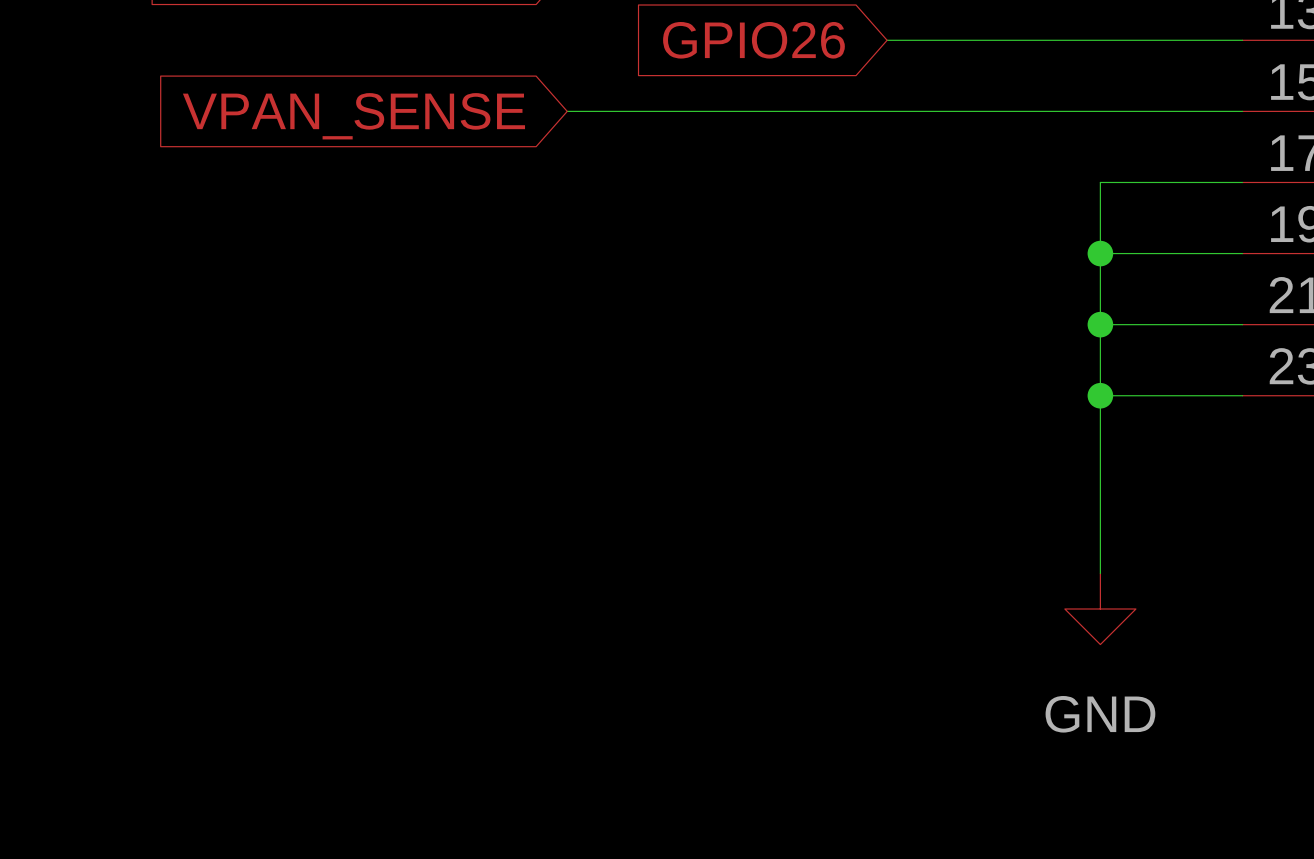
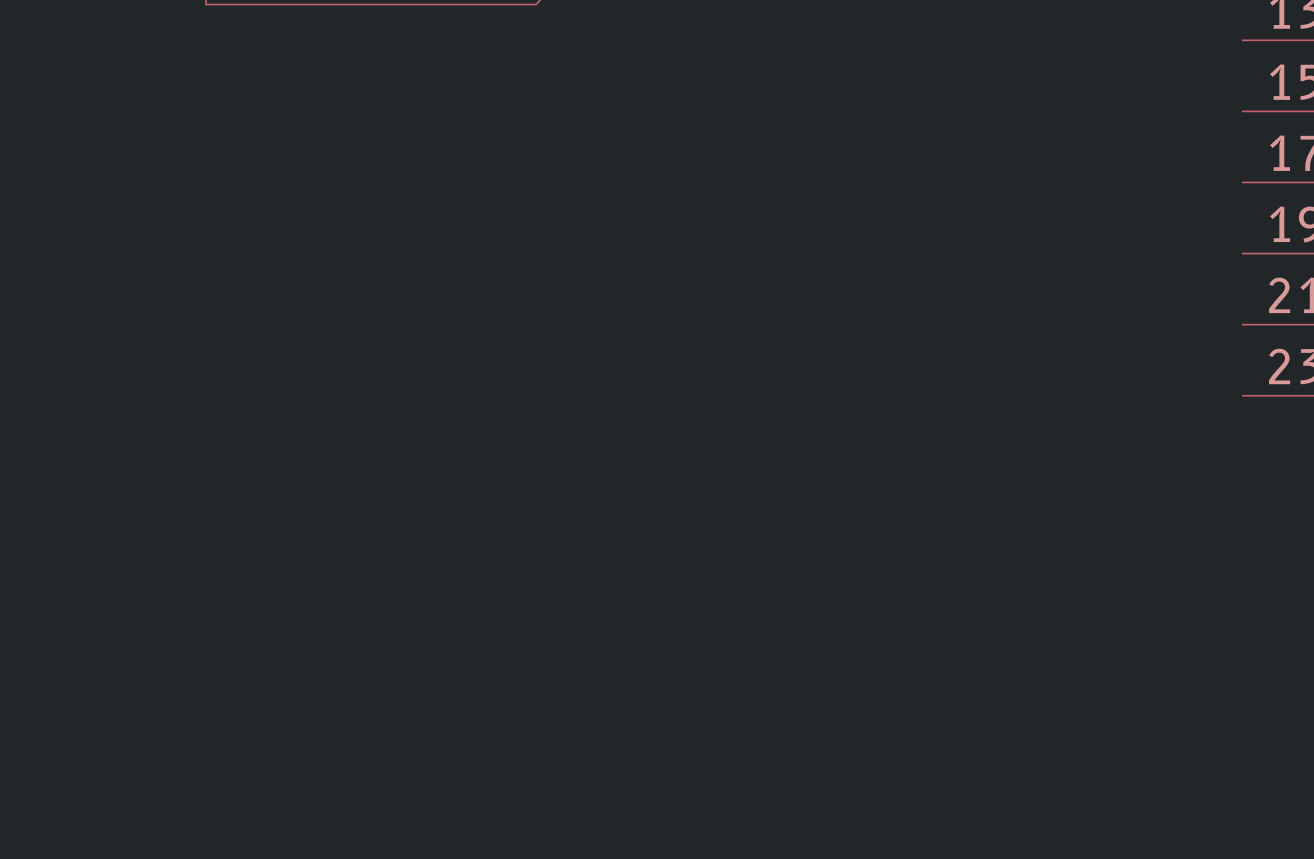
global label: GPIO26 (753, 40) -> none
wire: (887, 40) (1242, 40) -> none
wire: (567, 111) (1242, 111) -> none
global label: VPAN_SENSE (353, 116) -> none
wire: (1242, 182) (1100, 182) (1100, 573) -> none
wire: (1100, 253) (1242, 253) -> none
junction: (1100, 253) -> none
wire: (1100, 324) (1242, 324) -> none
junction: (1100, 324) -> none
wire: (1100, 395) (1242, 395) -> none
junction: (1100, 395) -> none
power symbol: GND (1100, 609) -> none

